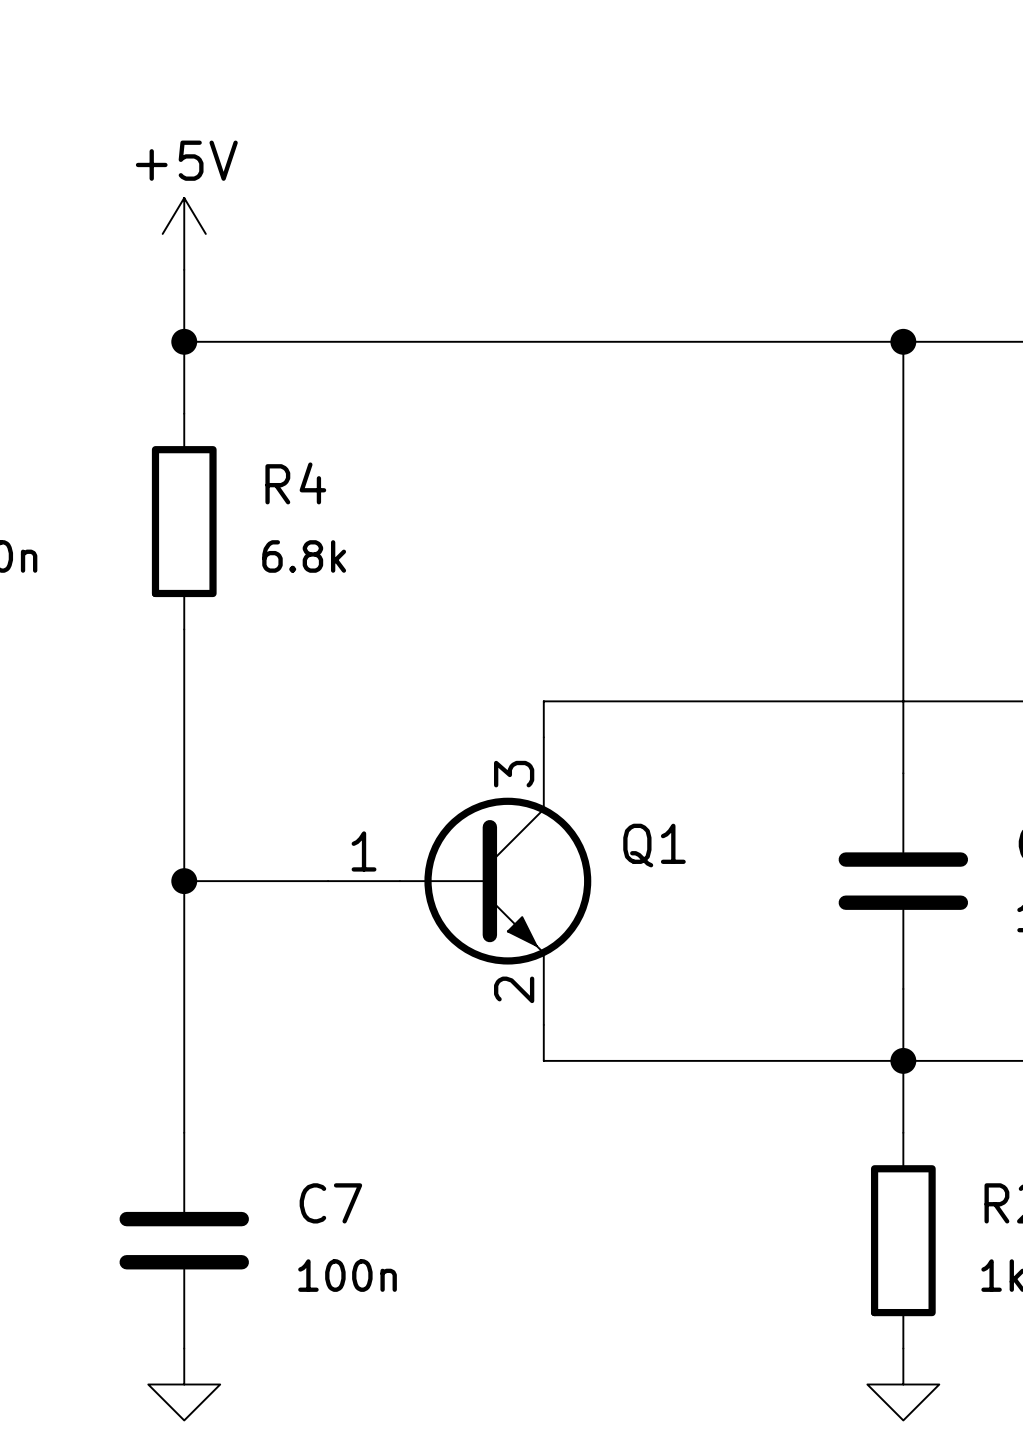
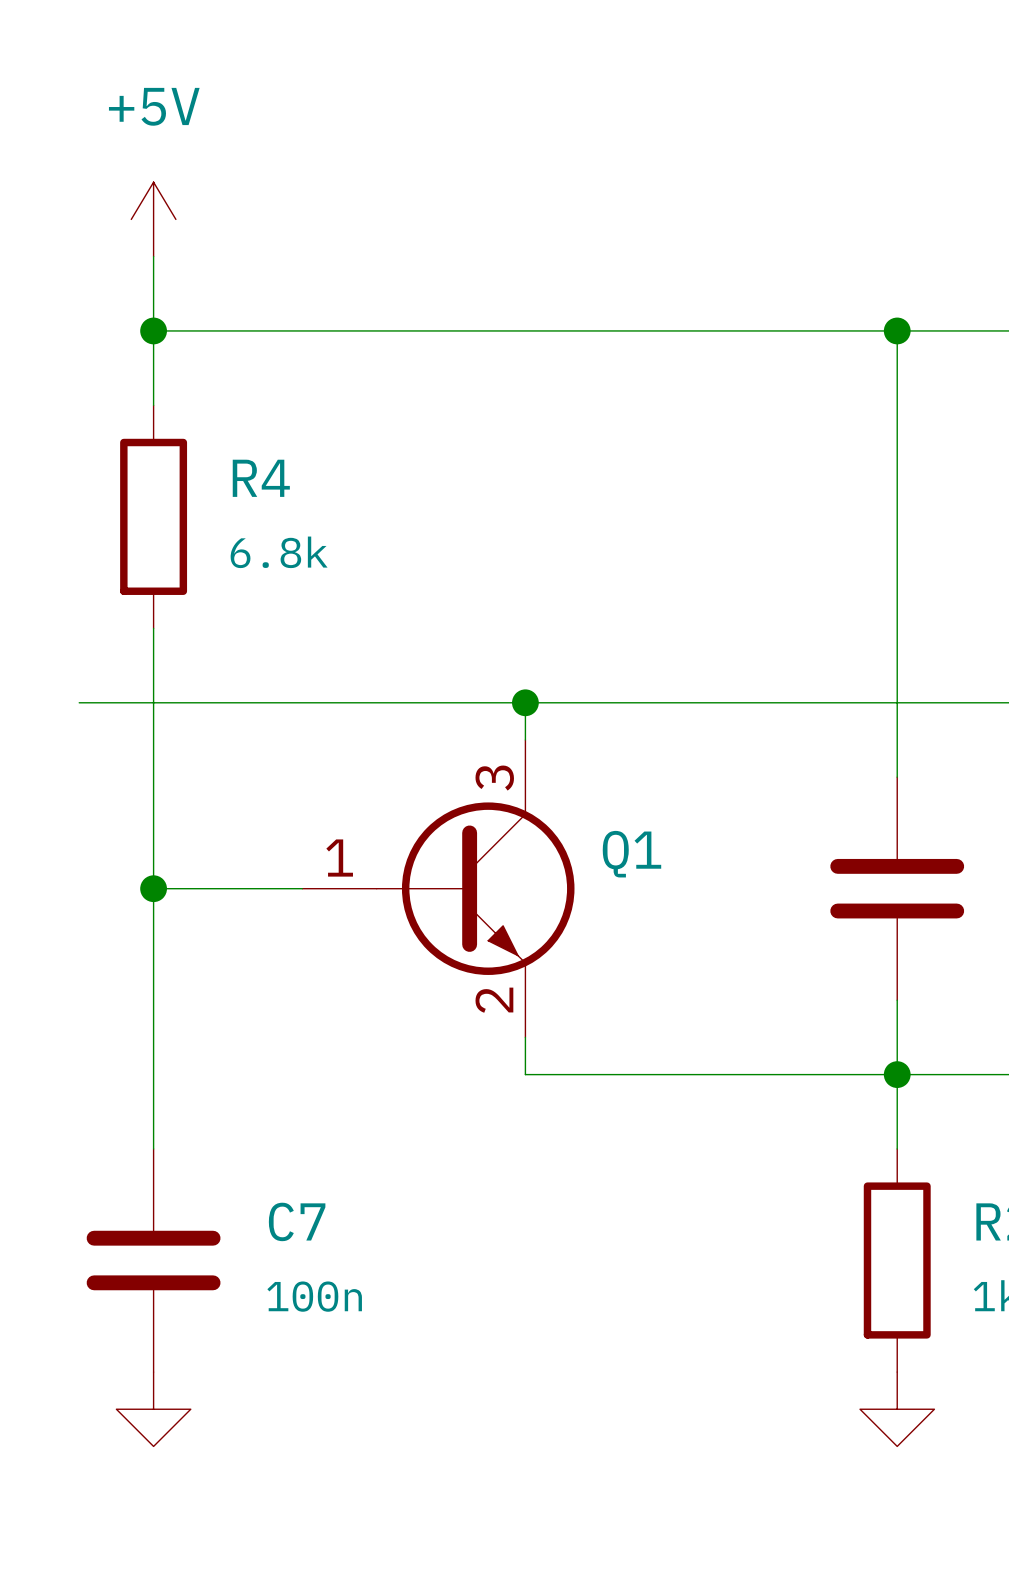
power symbol text position: +5V (186, 160) -> +5V (154, 106)
wire: none -> (79, 702) (525, 702)
junction: none -> (525, 702)

